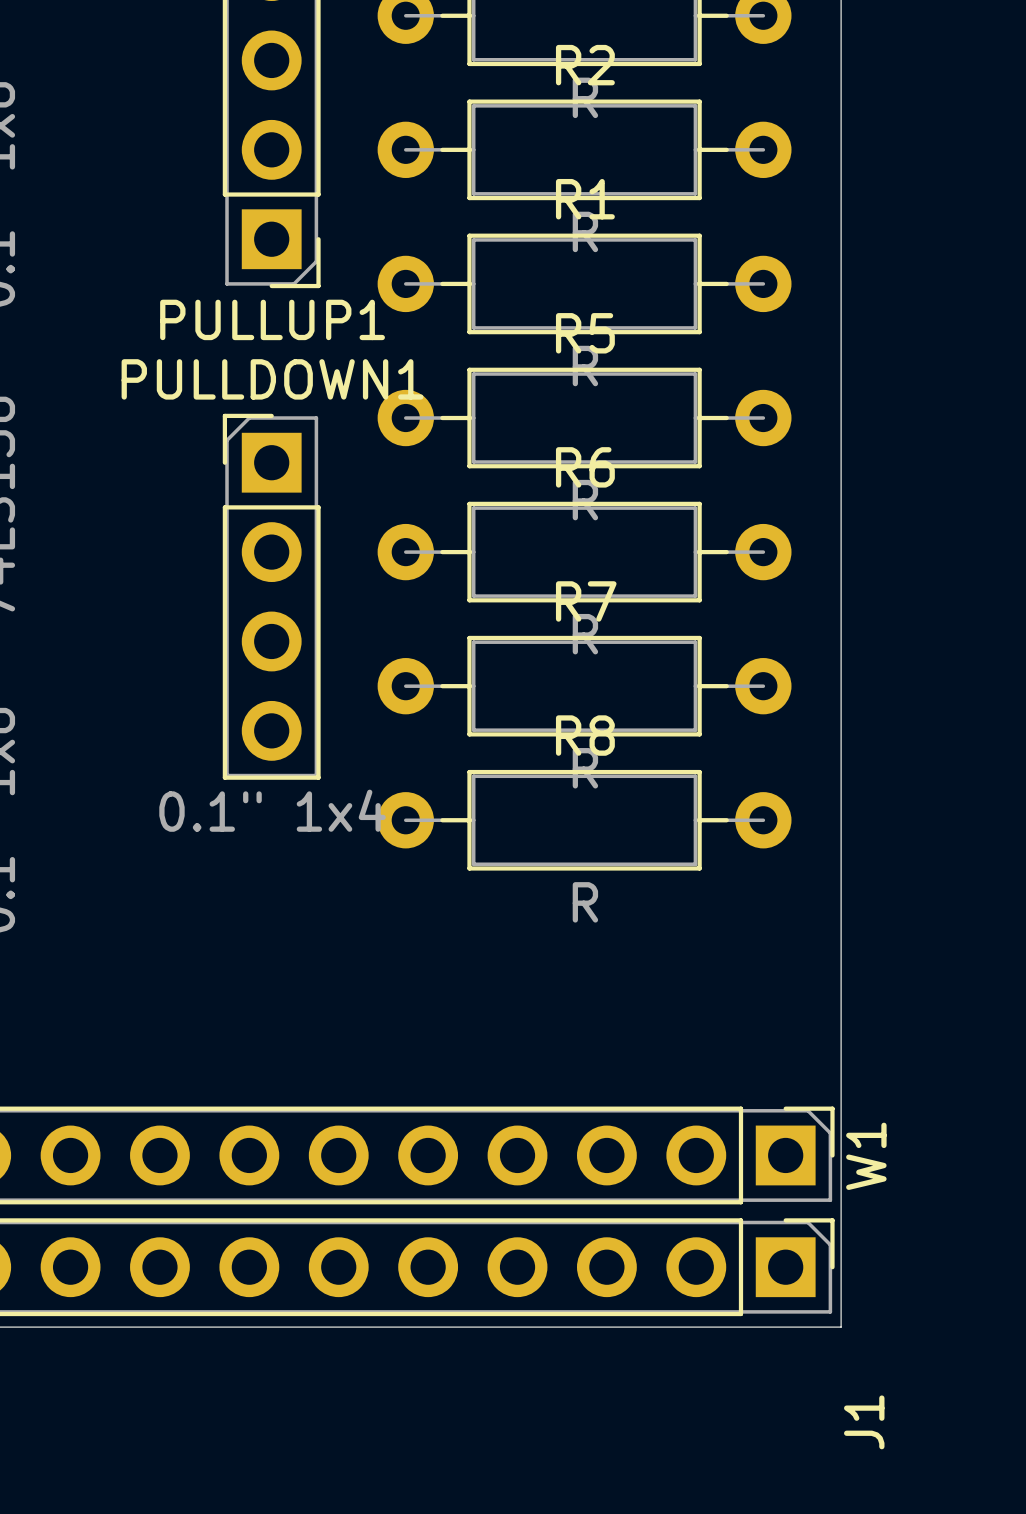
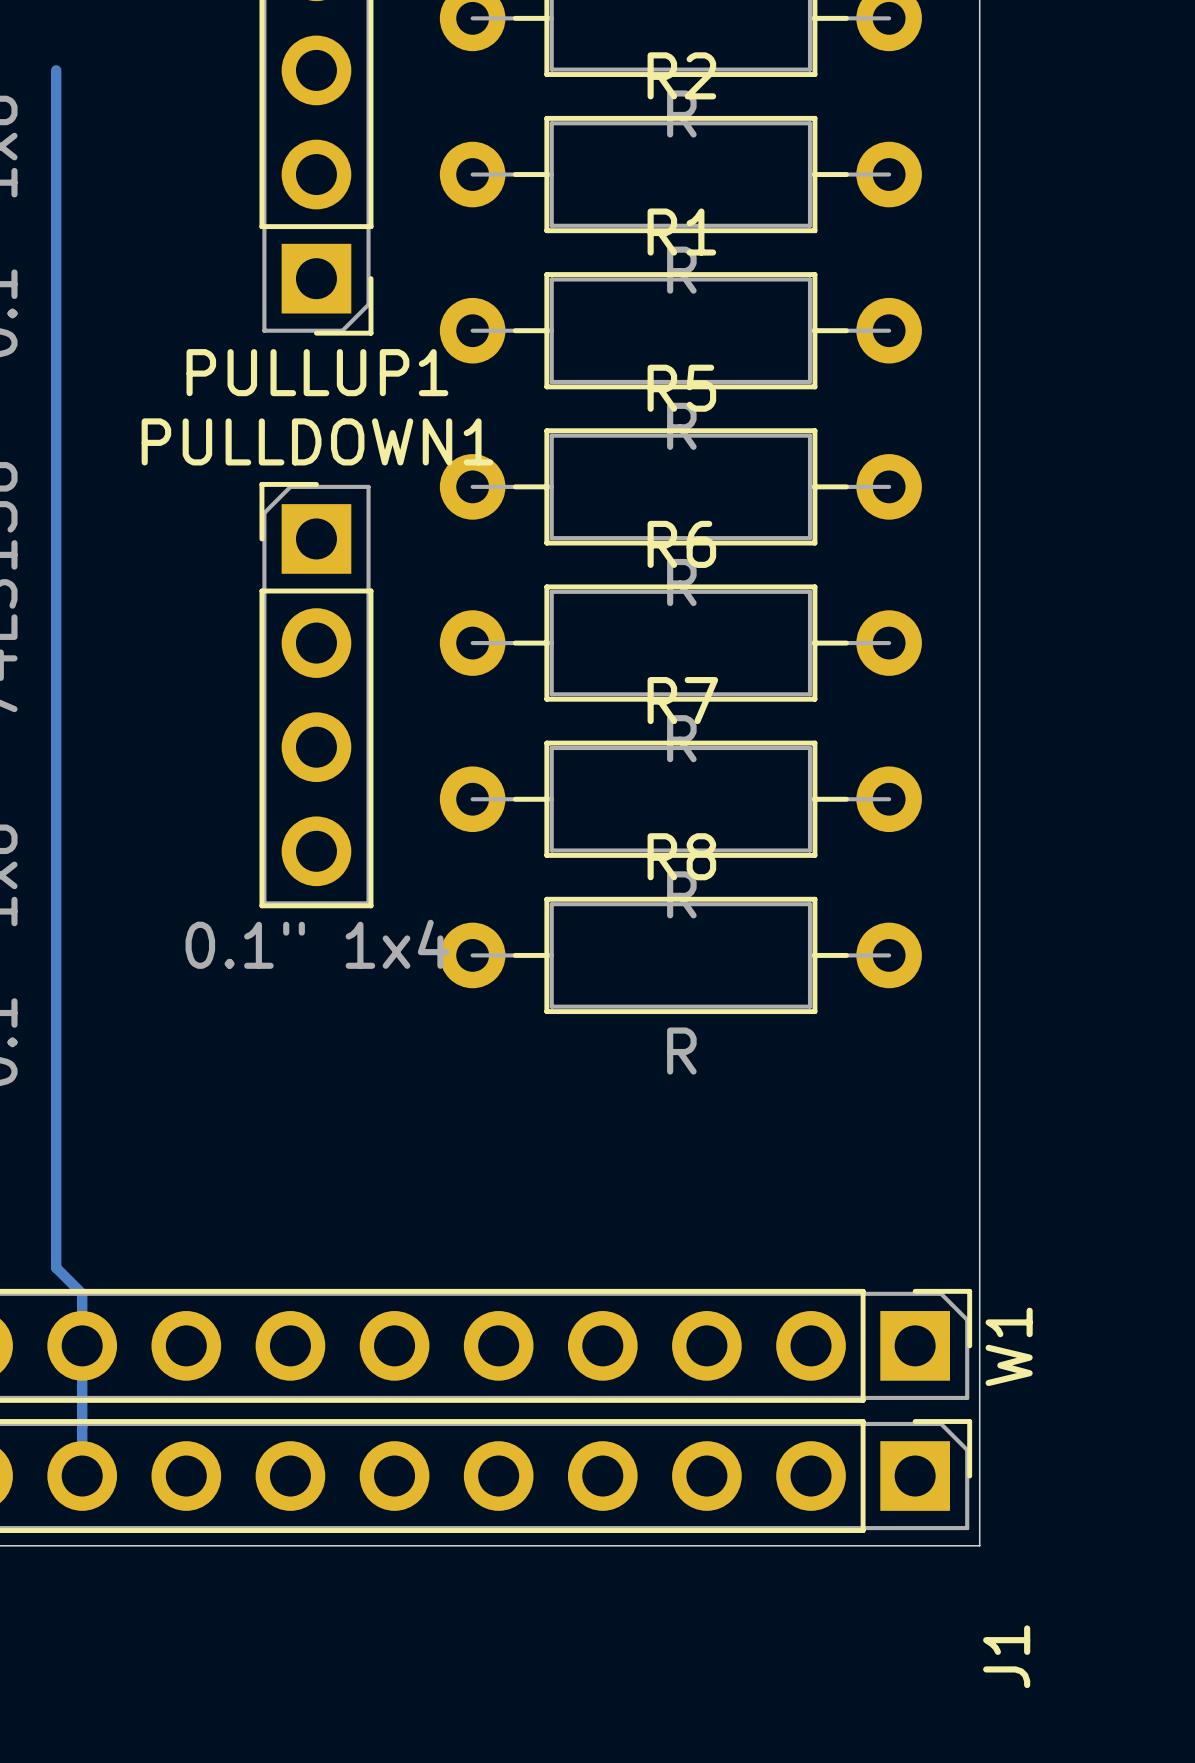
bottom track: none -> (56, 70) (56, 1267) (82, 1293) (82, 1476)

